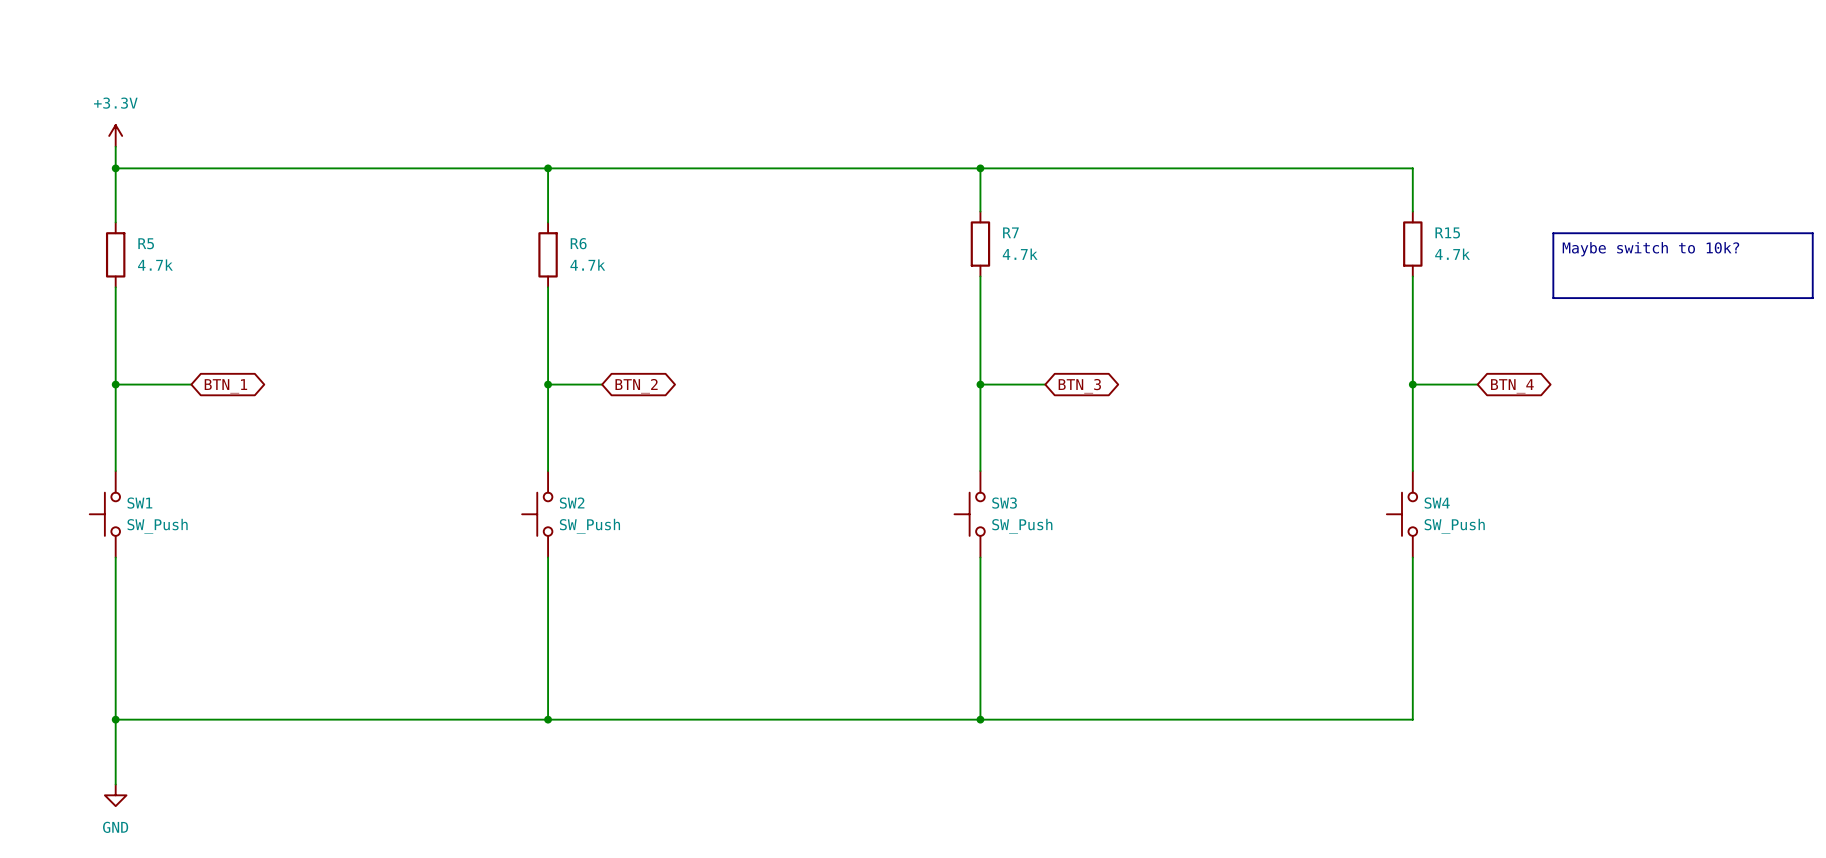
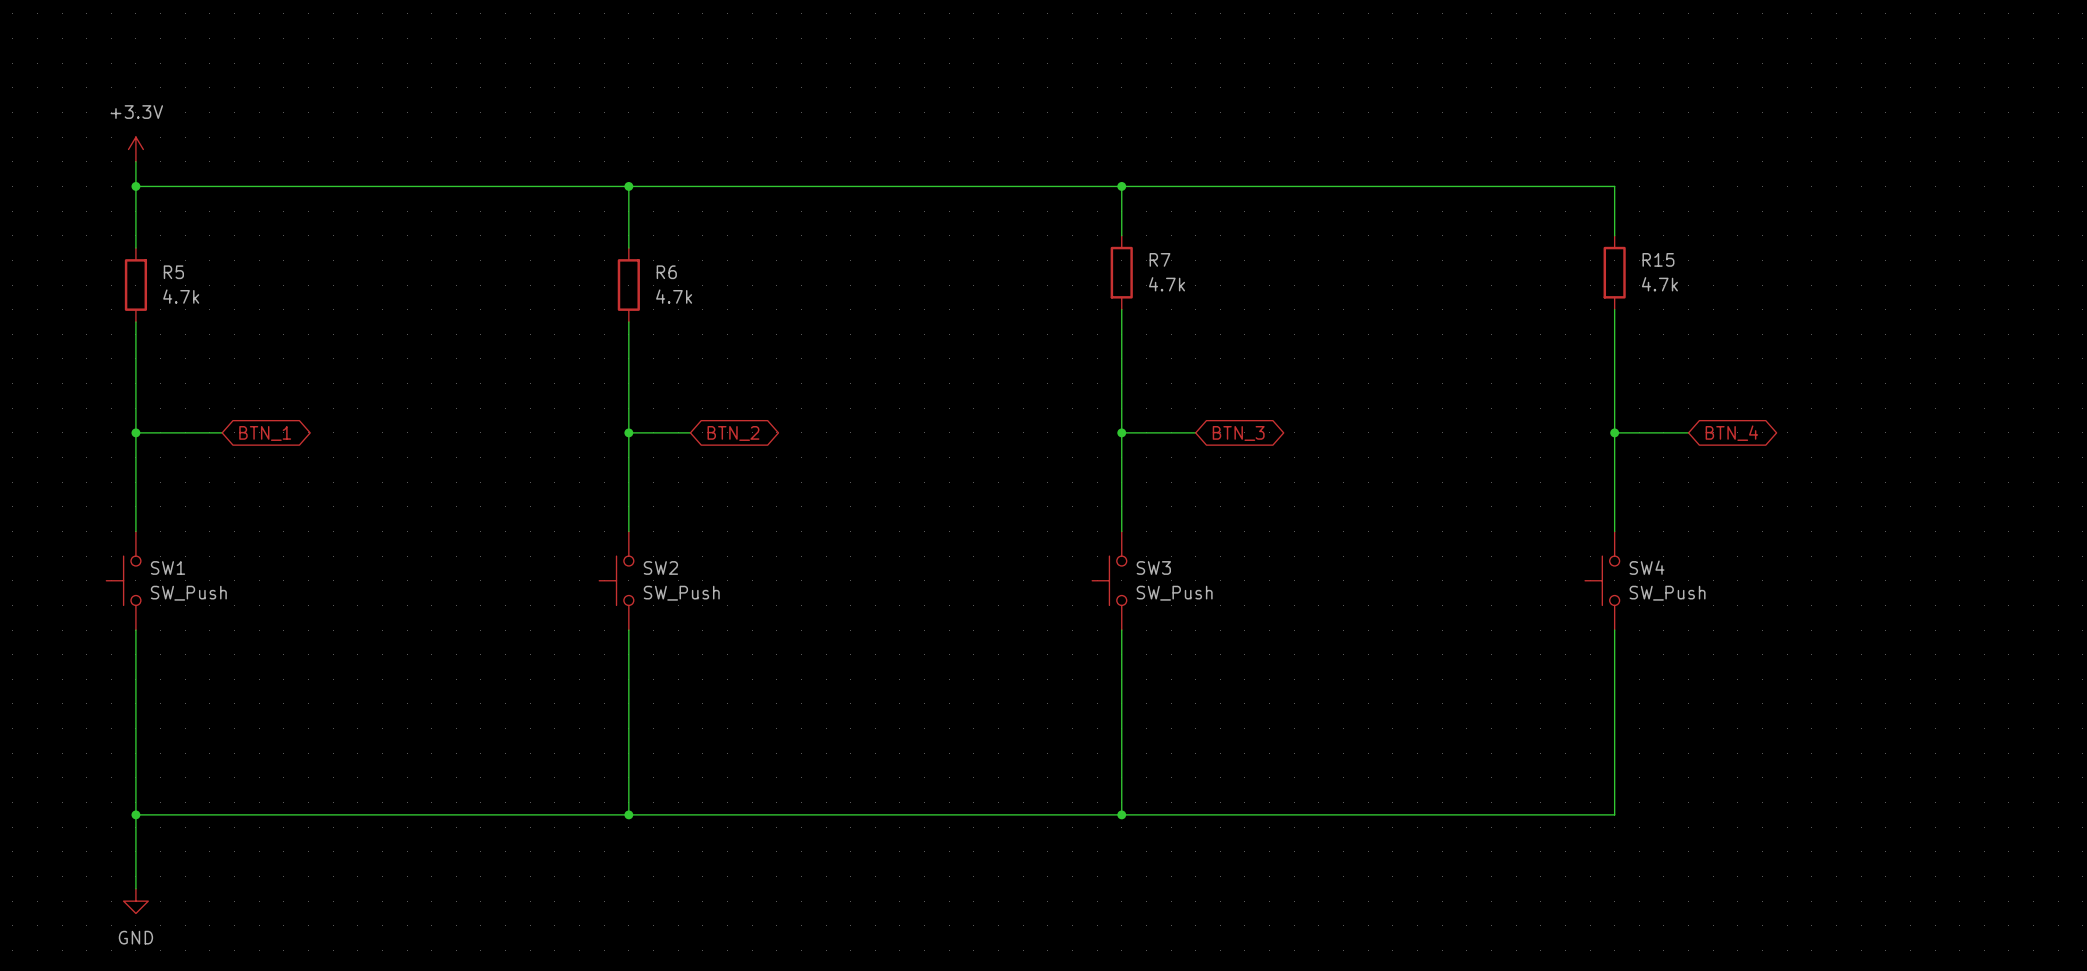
line: (1553, 233) (1812, 233) (1812, 298) (1553, 298) (1553, 233) -> none
text: Maybe switch to 10k? (1650, 249) -> none

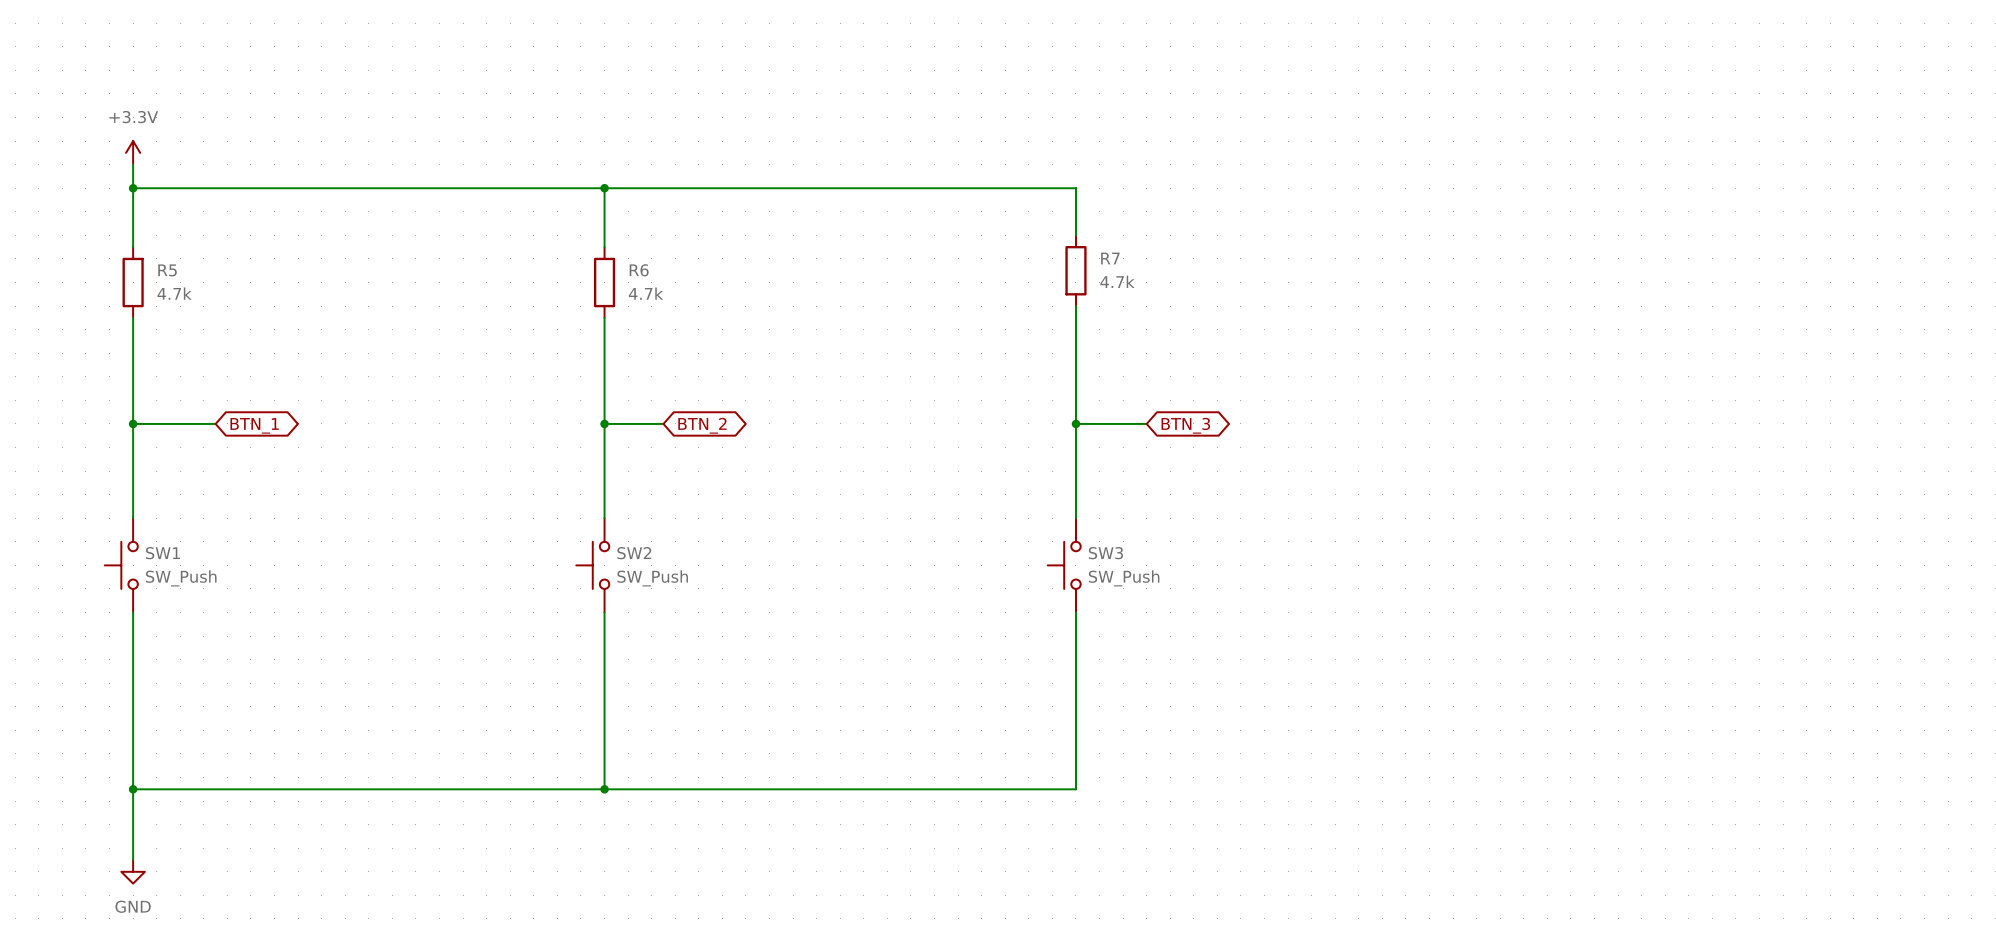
wire: (1121, 186) (1614, 186) (1614, 235) -> none
junction: (1121, 186) -> none
R15: 4.7k (1614, 272) -> none
wire: (1614, 309) (1614, 531) -> none
wire: (1614, 432) (1688, 432) -> none
junction: (1614, 432) -> none
global label: BTN_4 (1731, 433) -> none
SW4: SW_Push (1602, 580) -> none
wire: (1614, 630) (1614, 814) (1121, 814) -> none
junction: (1121, 814) -> none

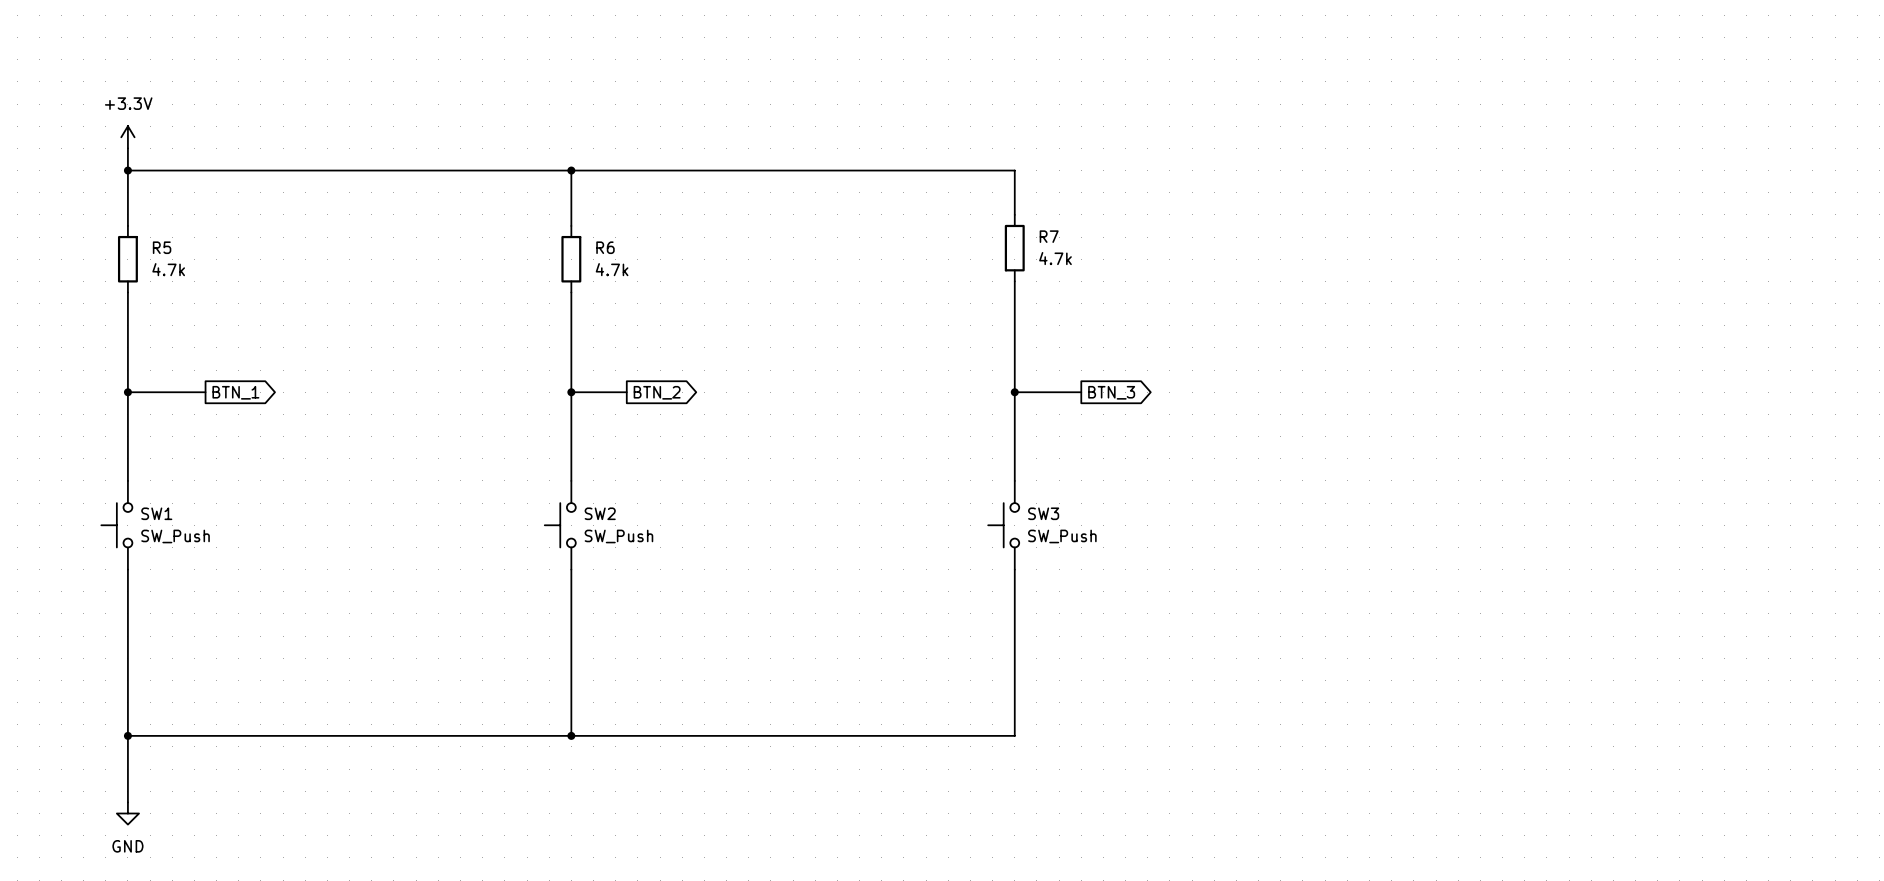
global label shape: bidirectional (254, 425) -> output (235, 392)
global label shape: bidirectional (702, 425) -> output (657, 392)
global label shape: bidirectional (1185, 425) -> output (1111, 392)

